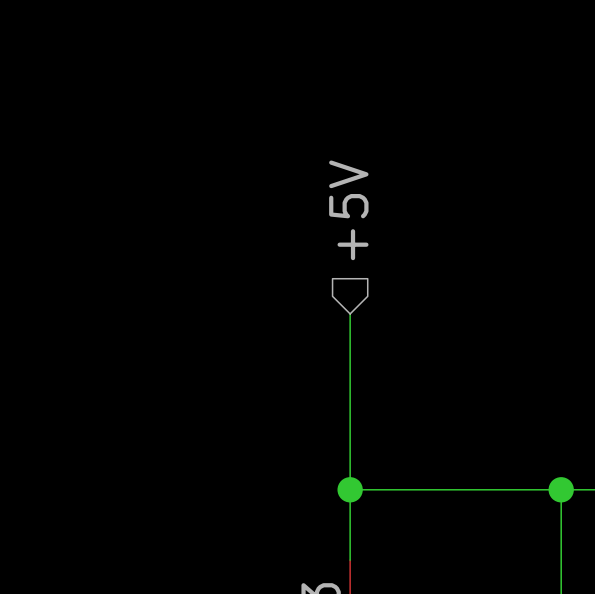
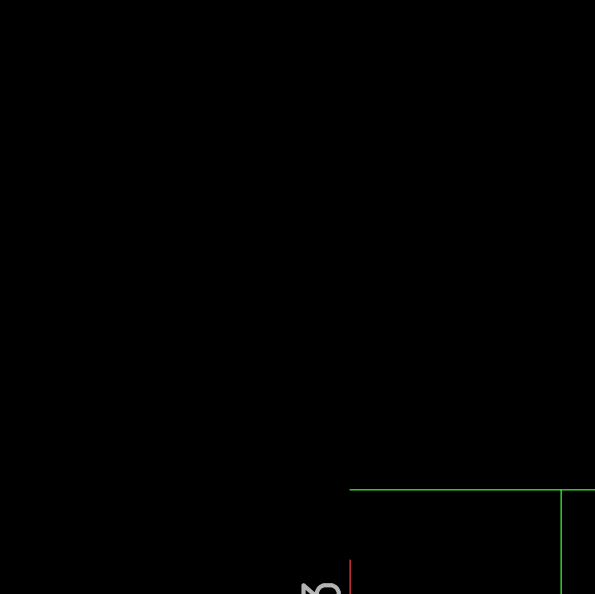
hierarchical label: +5V (348, 210) -> none
wire: (350, 313) (350, 560) -> none
junction: (350, 489) -> none
junction: (561, 489) -> none

